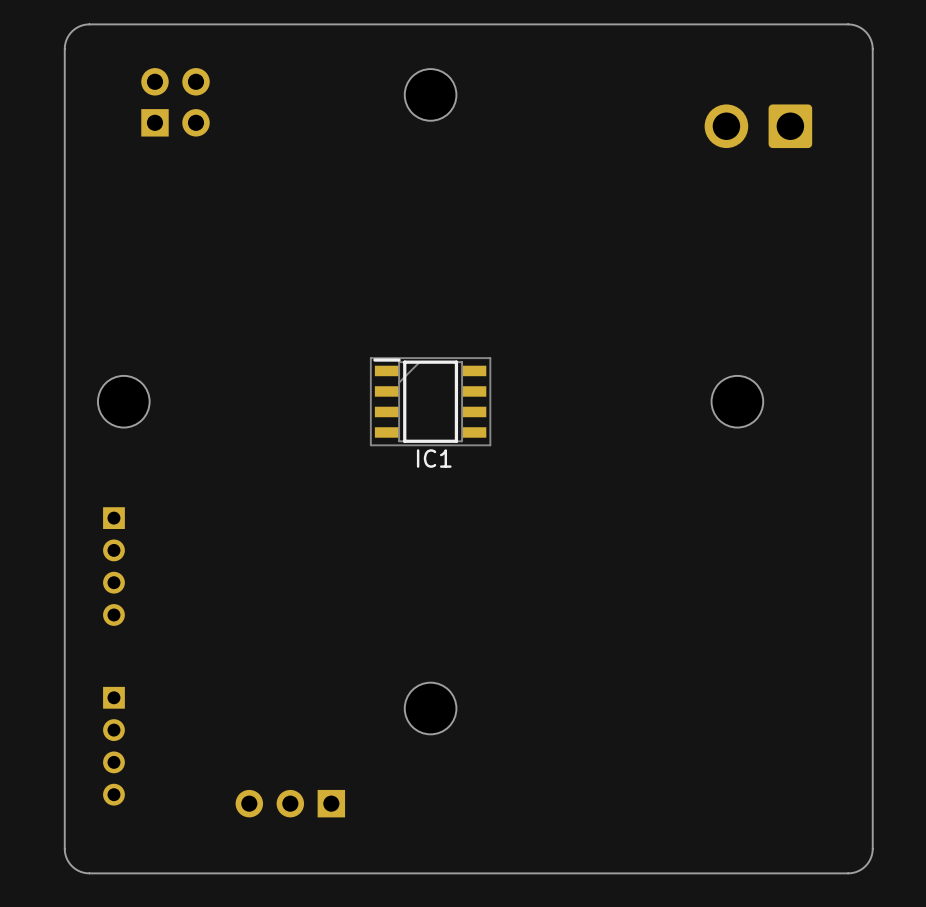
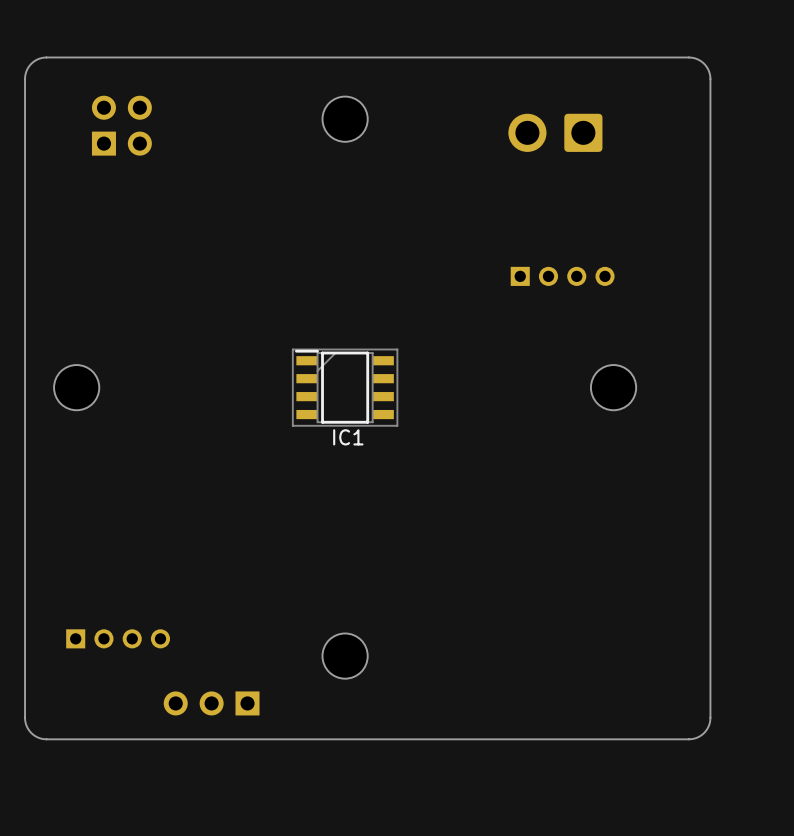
board edge: (823, 24) (850, 24) (858, 26) (868, 35) (872, 48) (872, 848) (871, 856) (865, 866) (856, 871) (848, 873) (86, 873) (74, 868) (65, 854) (64, 779) -> (688, 57) (698, 59) (704, 63) (709, 71) (710, 79) (710, 717) (708, 727) (704, 733) (698, 737) (688, 739) (46, 739) (39, 738) (31, 733) (27, 727) (25, 717)
part position: (758, 126) -> (555, 132)
part: none -> (562, 276)
part: (113, 566) -> none
part: none -> (118, 638)
part: (113, 746) -> none
part position: (290, 803) -> (211, 703)

